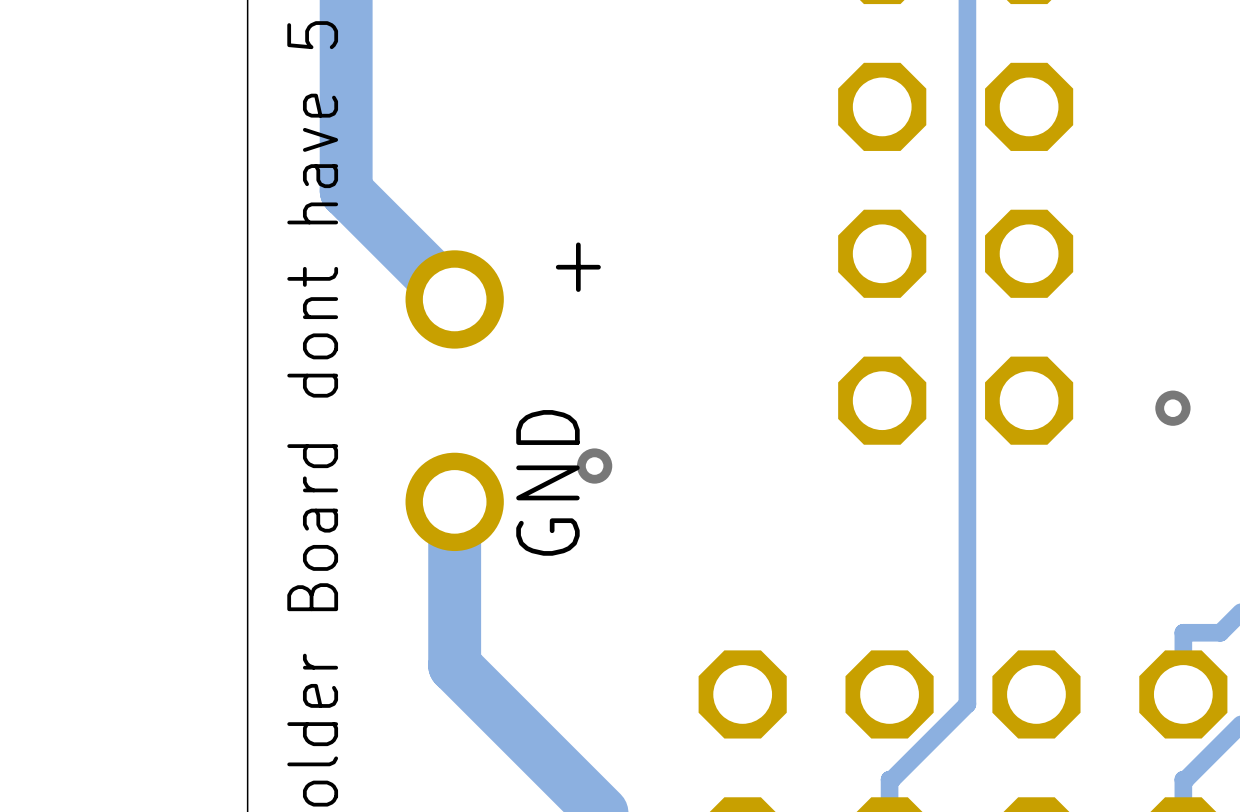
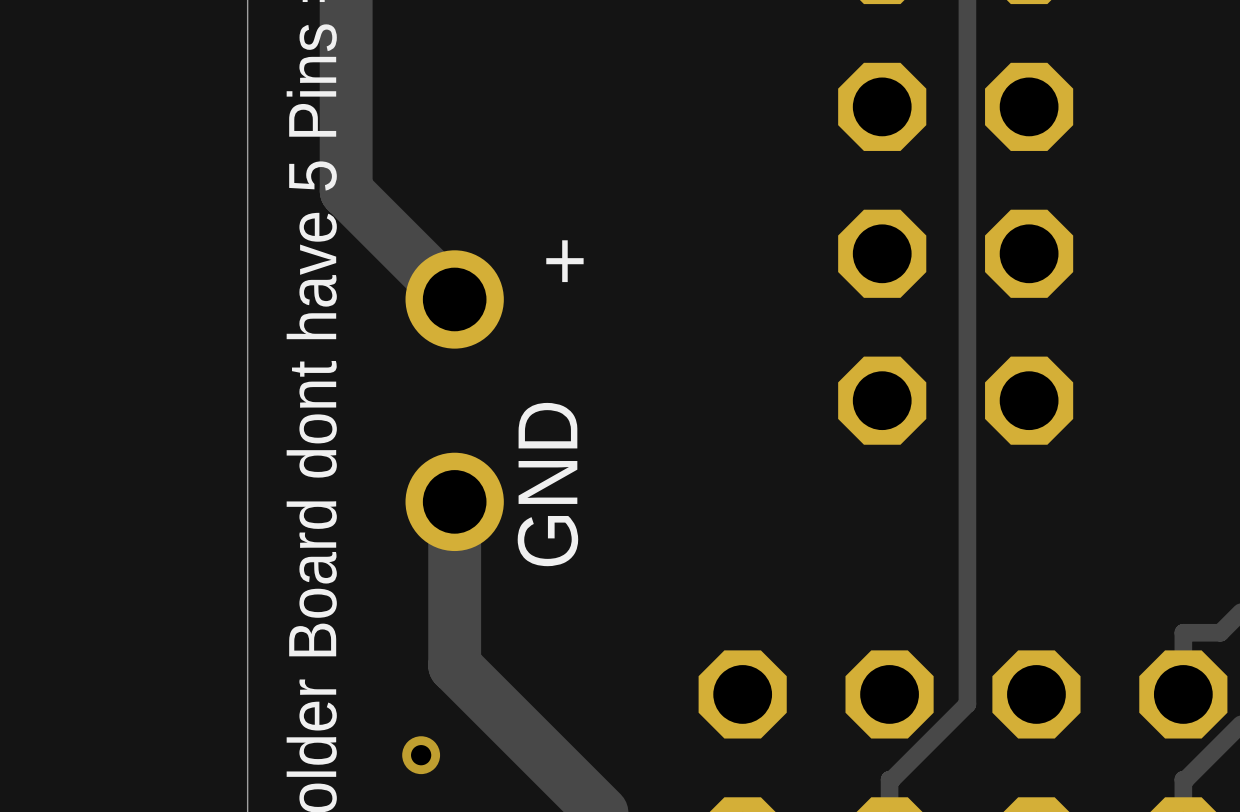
via: (1172, 408) -> none
via: (594, 466) -> none
via: none -> (421, 755)

